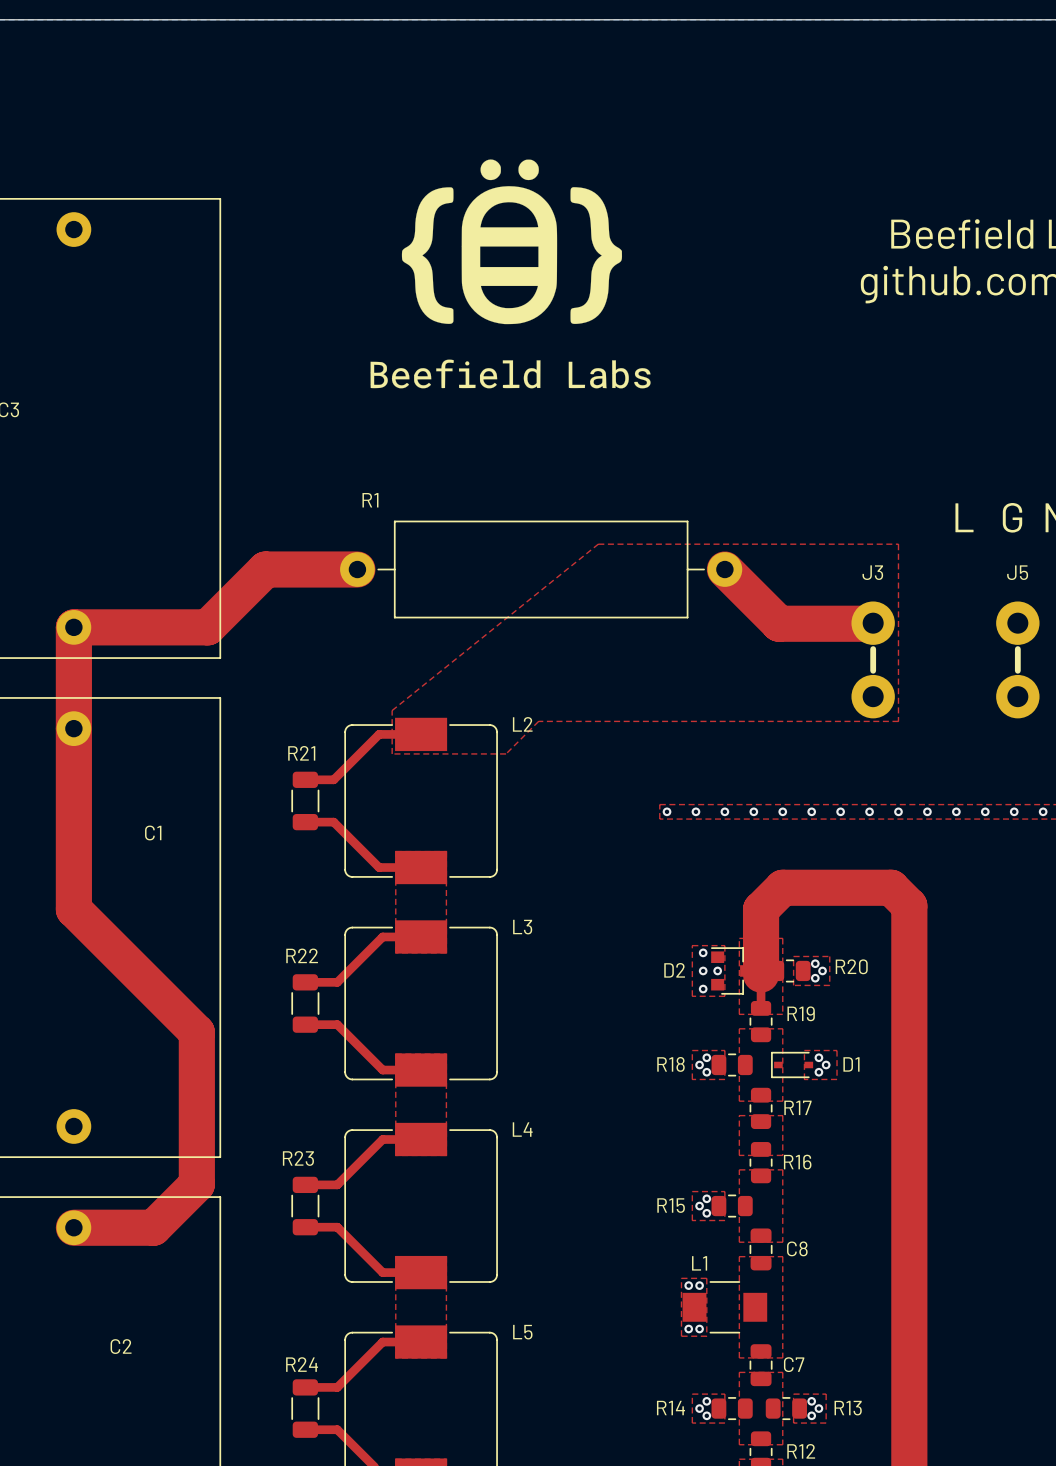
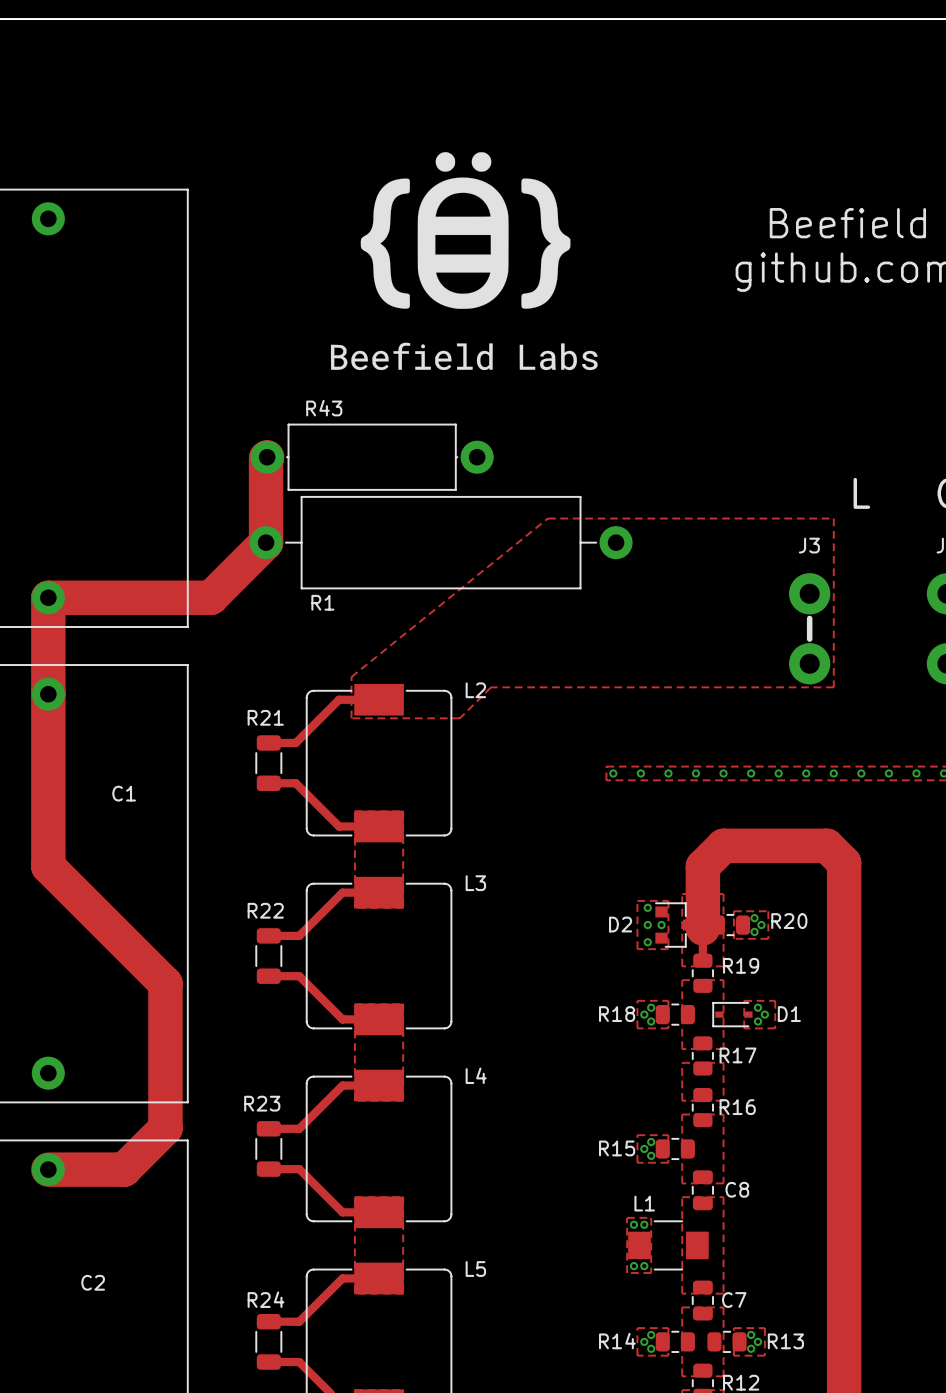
R43: none -> (372, 457)
R1 name position: R1 (370, 500) -> R1 (322, 602)
top track: (357, 569) (265, 569) (207, 627) -> (267, 457) (266, 542) (210, 597) (175, 597)
R1 position: (541, 569) -> (441, 542)
top track: (724, 569) (779, 623) (872, 623) -> none

